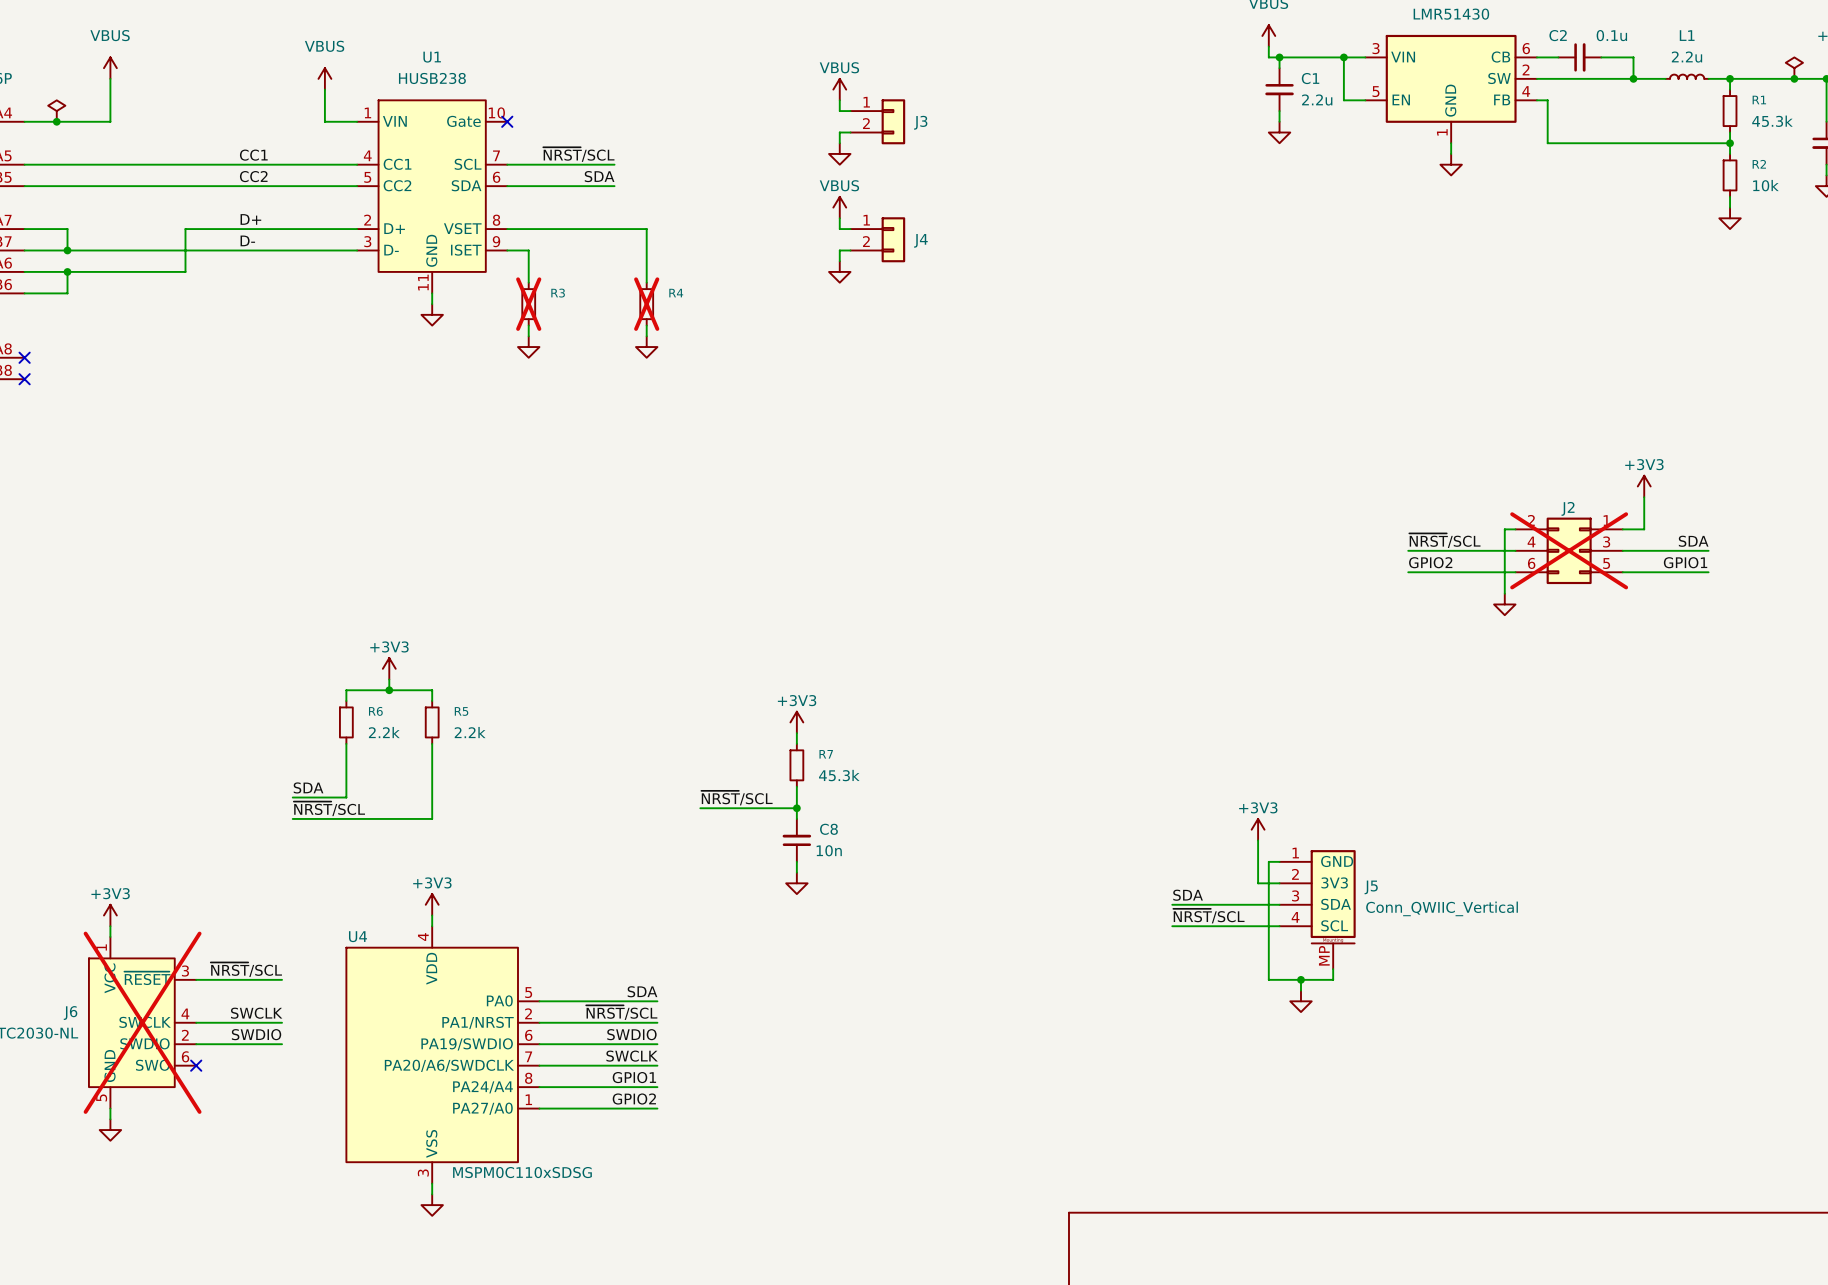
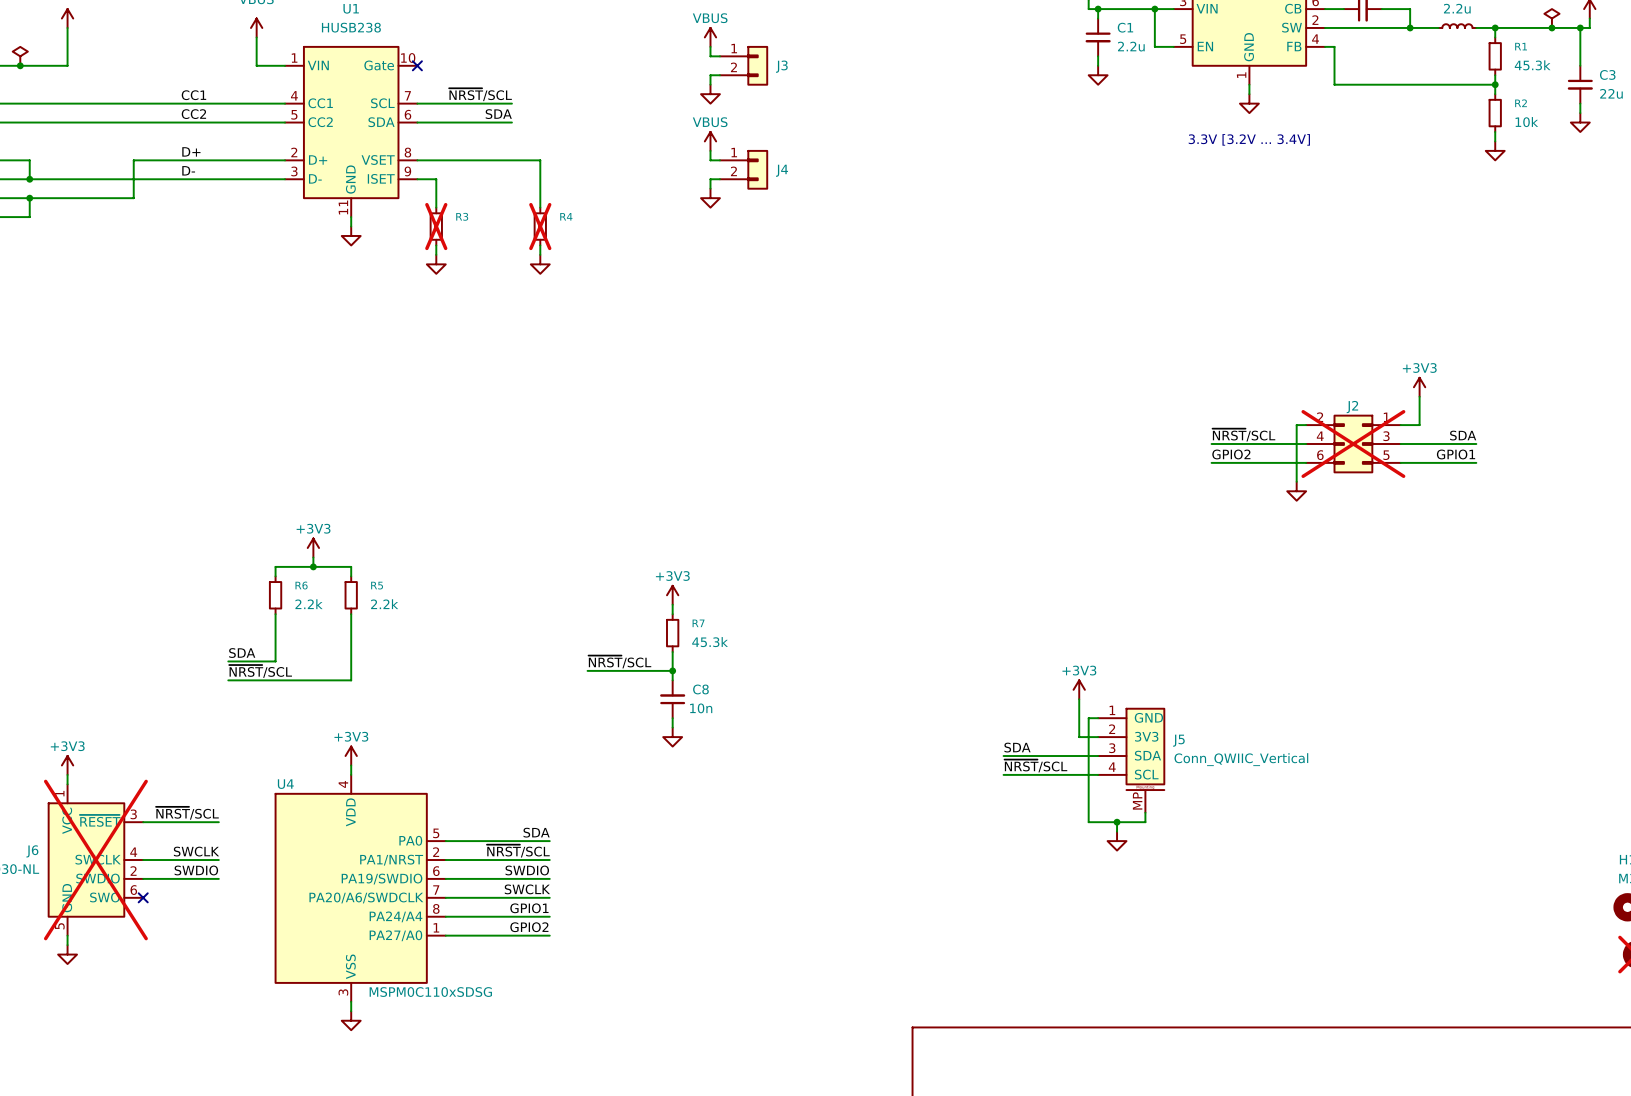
text: none -> 3.3V [3.2V ... 3.4V] (1249, 139)

